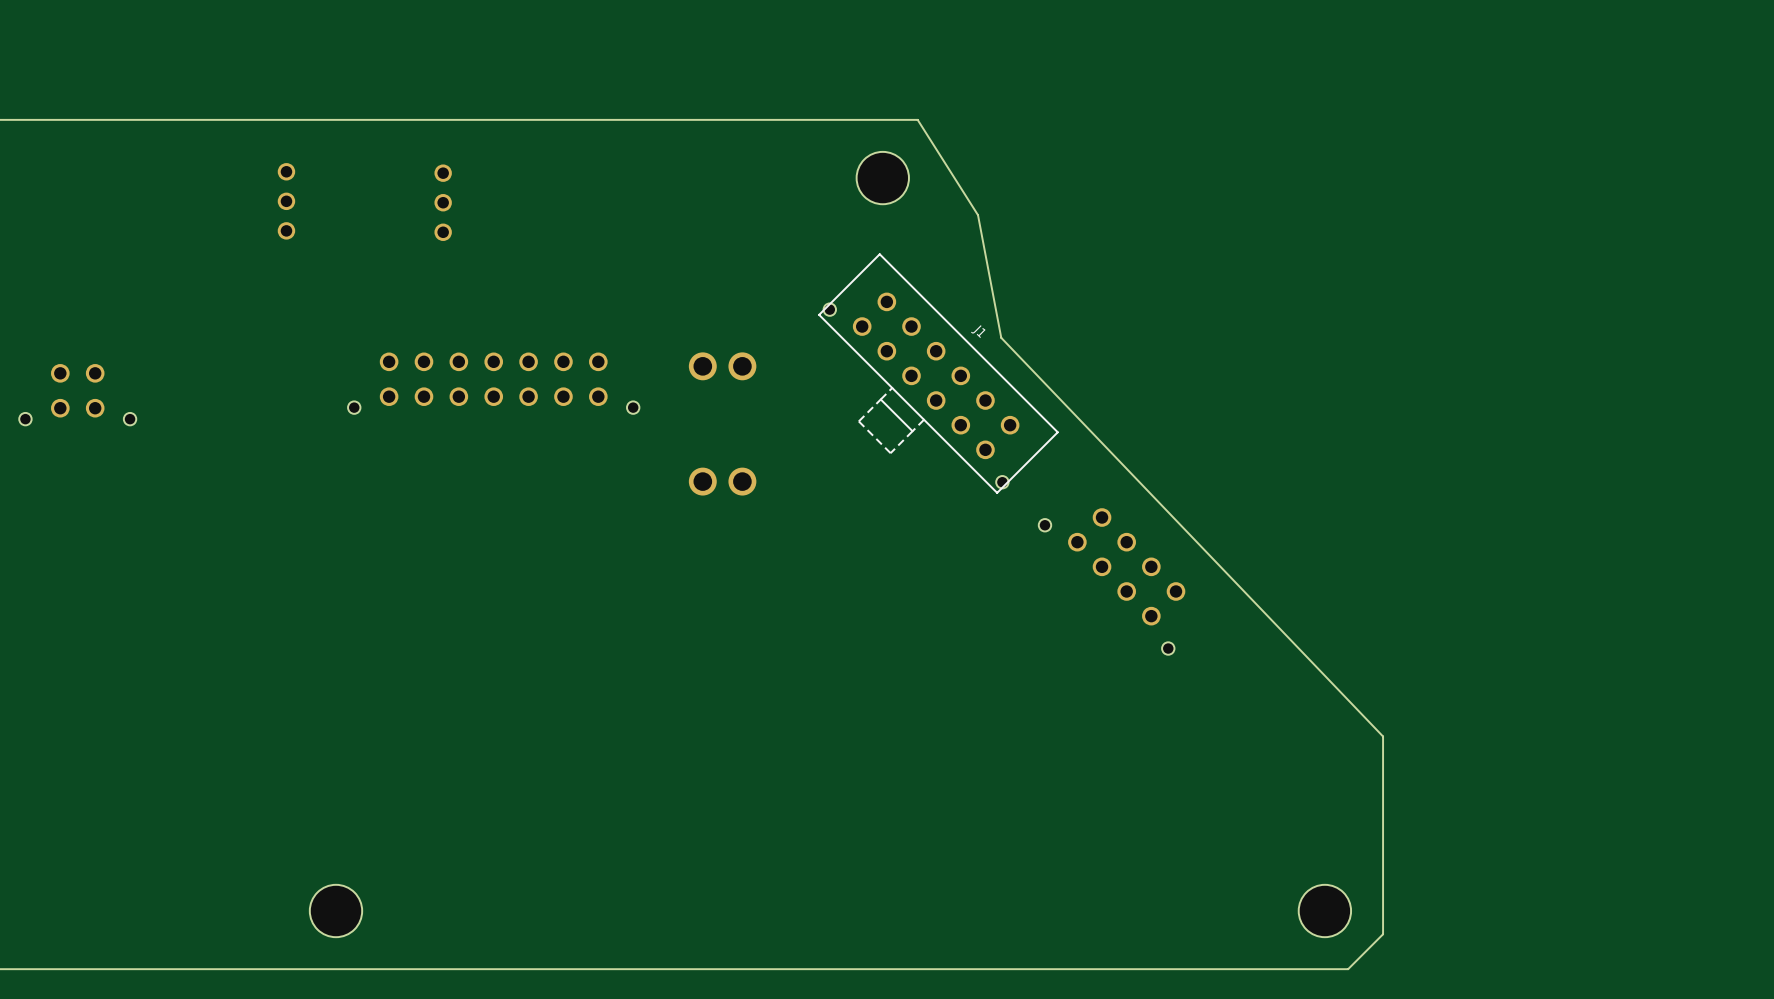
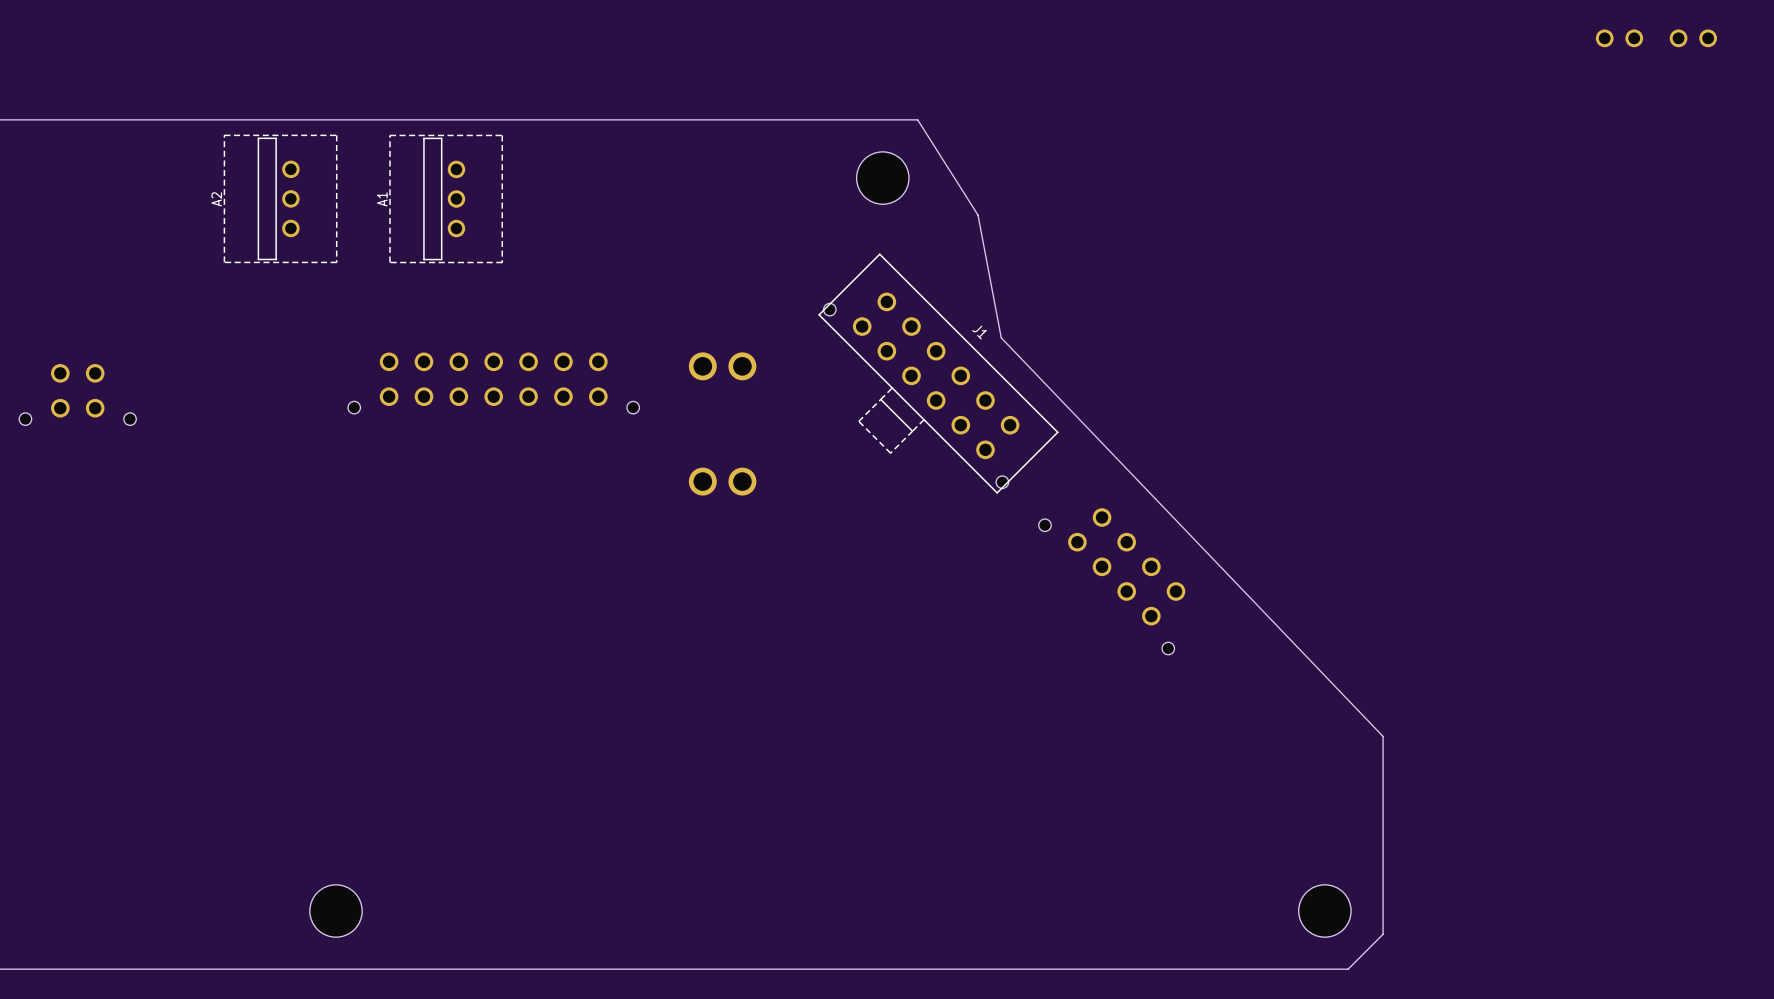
part: none -> (1619, 38)
part: none -> (1693, 38)
A2 side: top (286, 201) -> bottom (280, 198)
A1 side: top (443, 202) -> bottom (446, 198)

